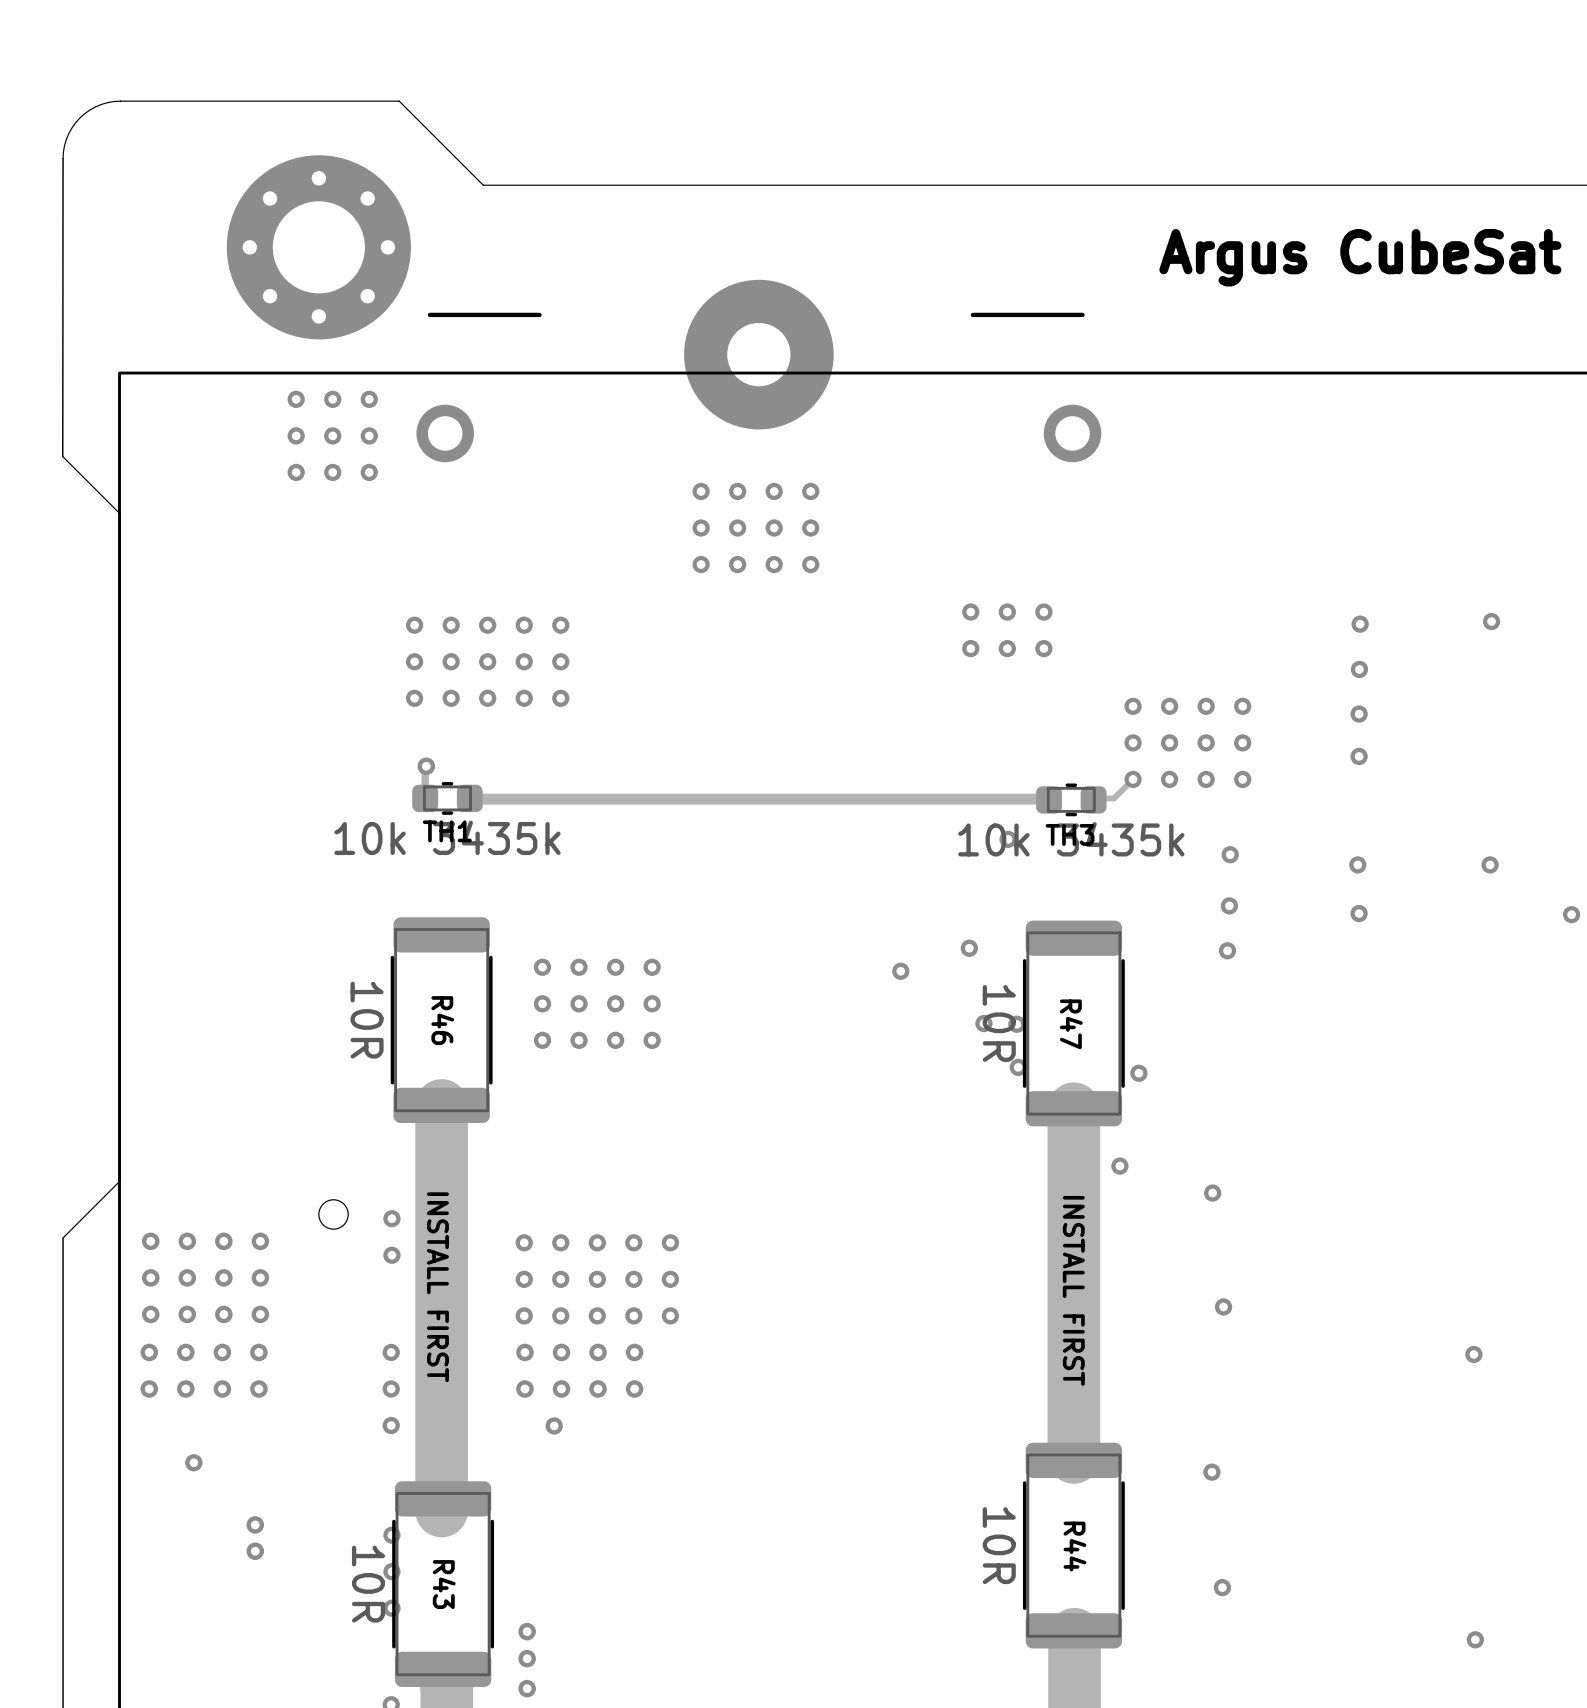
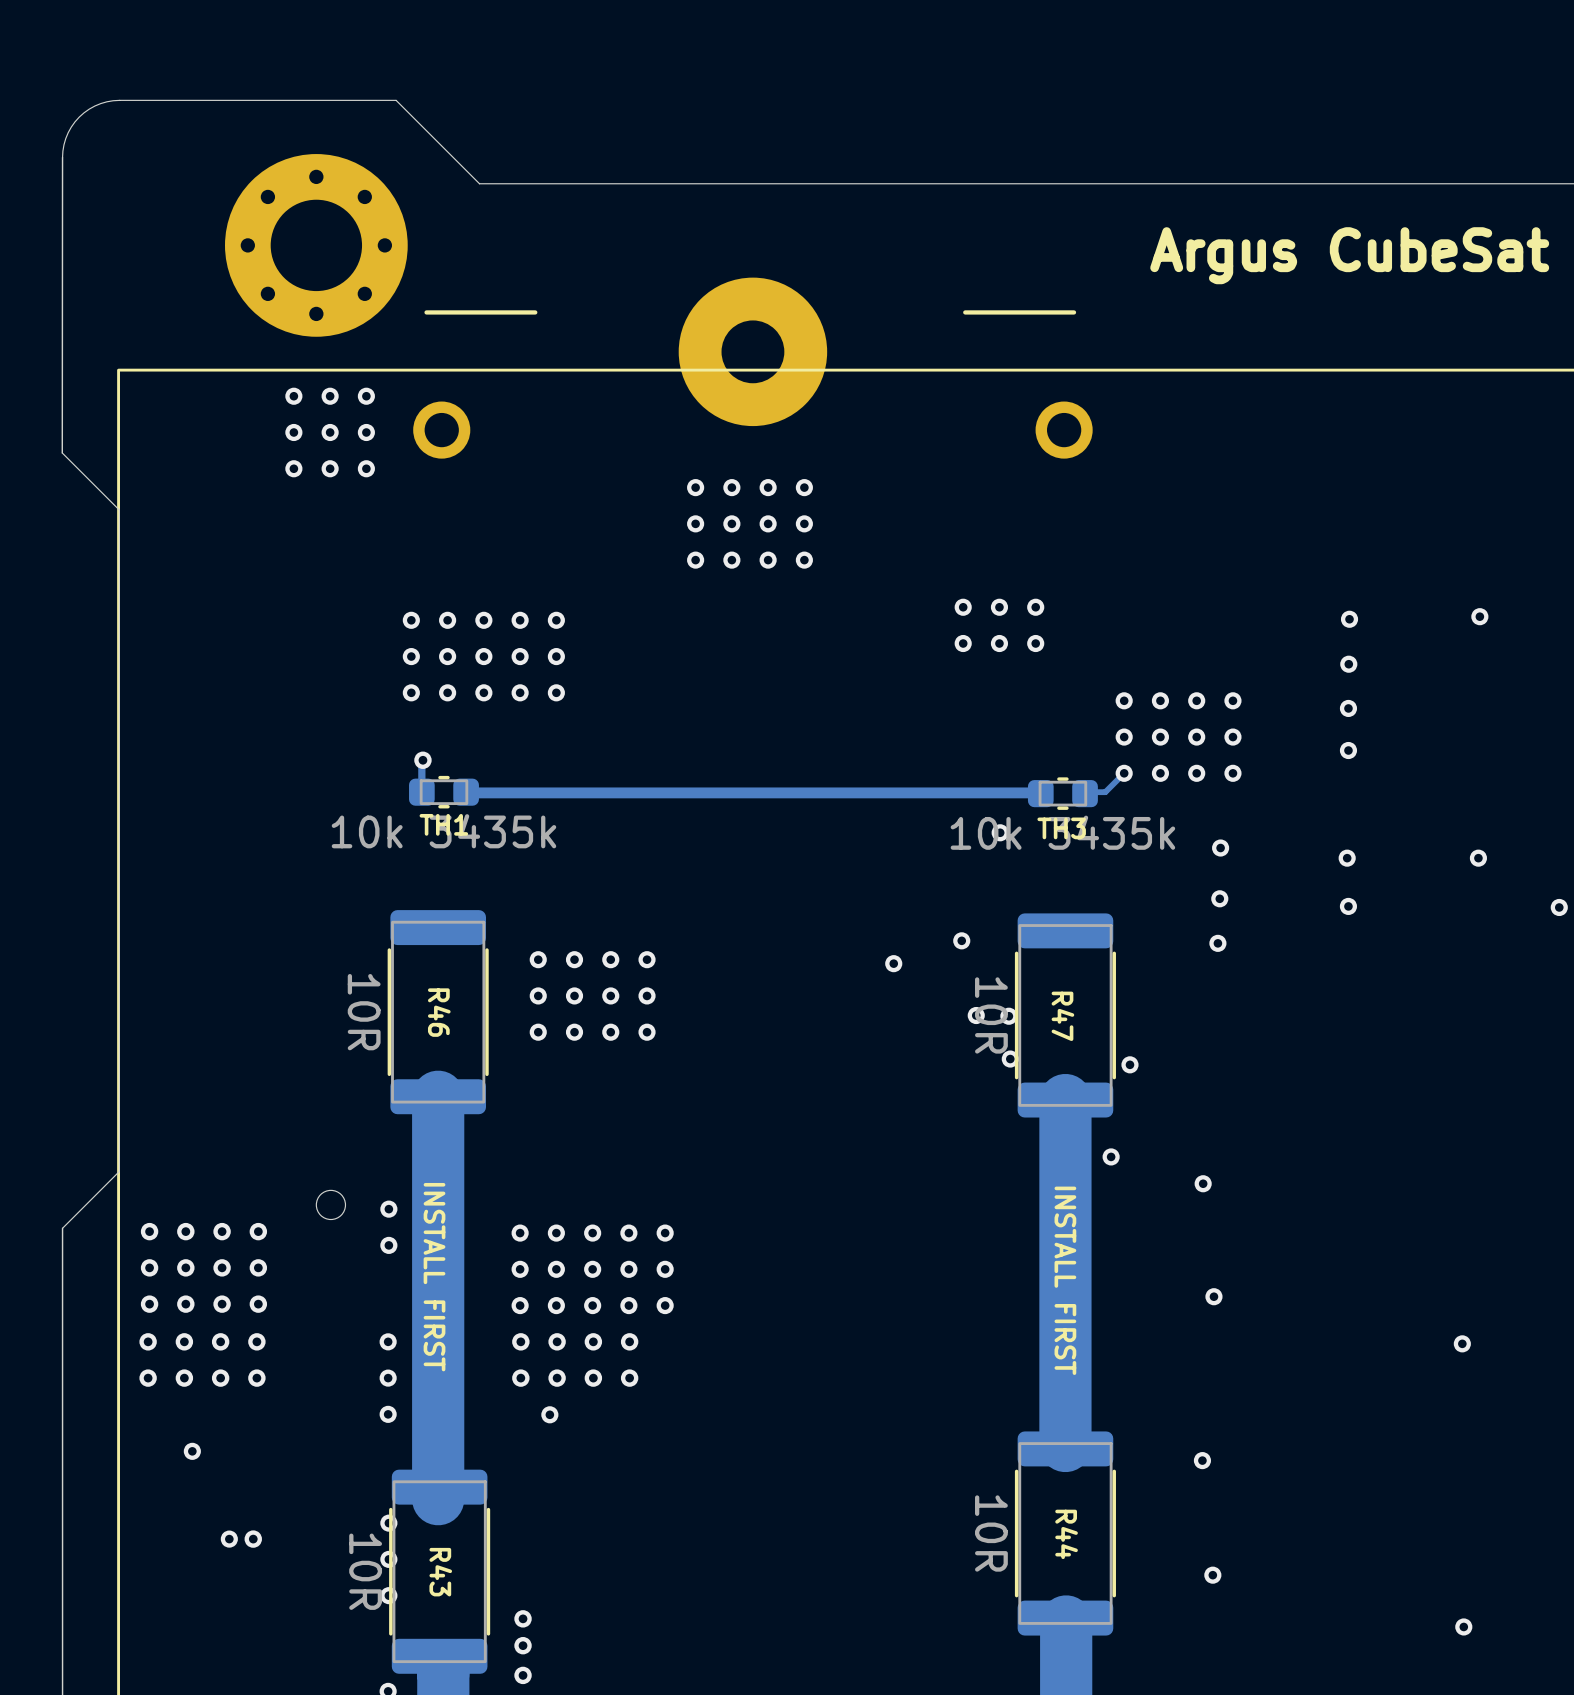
via position: (255, 1524) -> (229, 1539)

